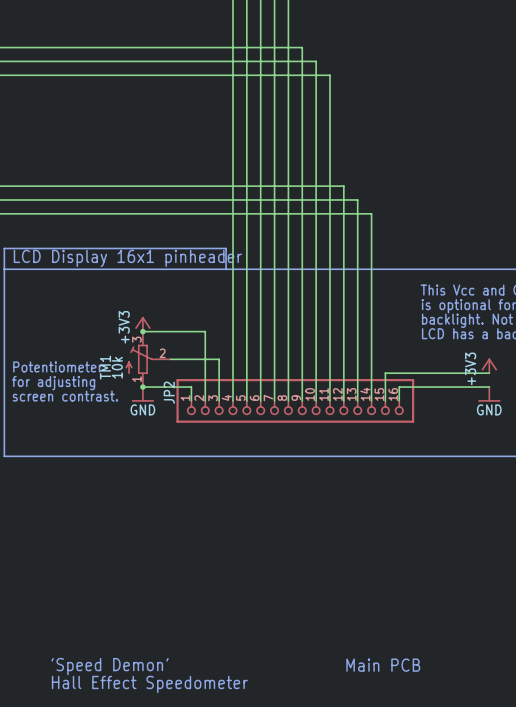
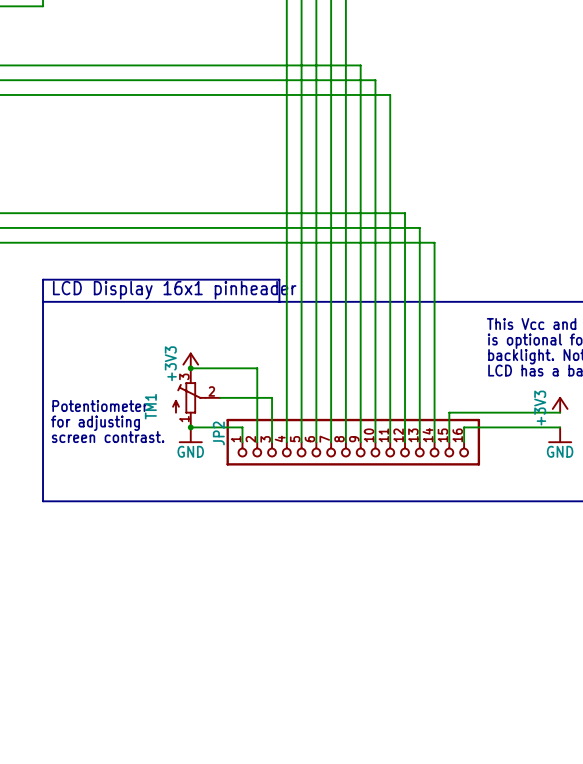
TM1 value: 10k (117, 367) -> none
text: Main PCB (383, 665) -> none
text: 'Speed Demon' (110, 666) -> none
text: Hall Effect Speedometer (149, 684) -> none

